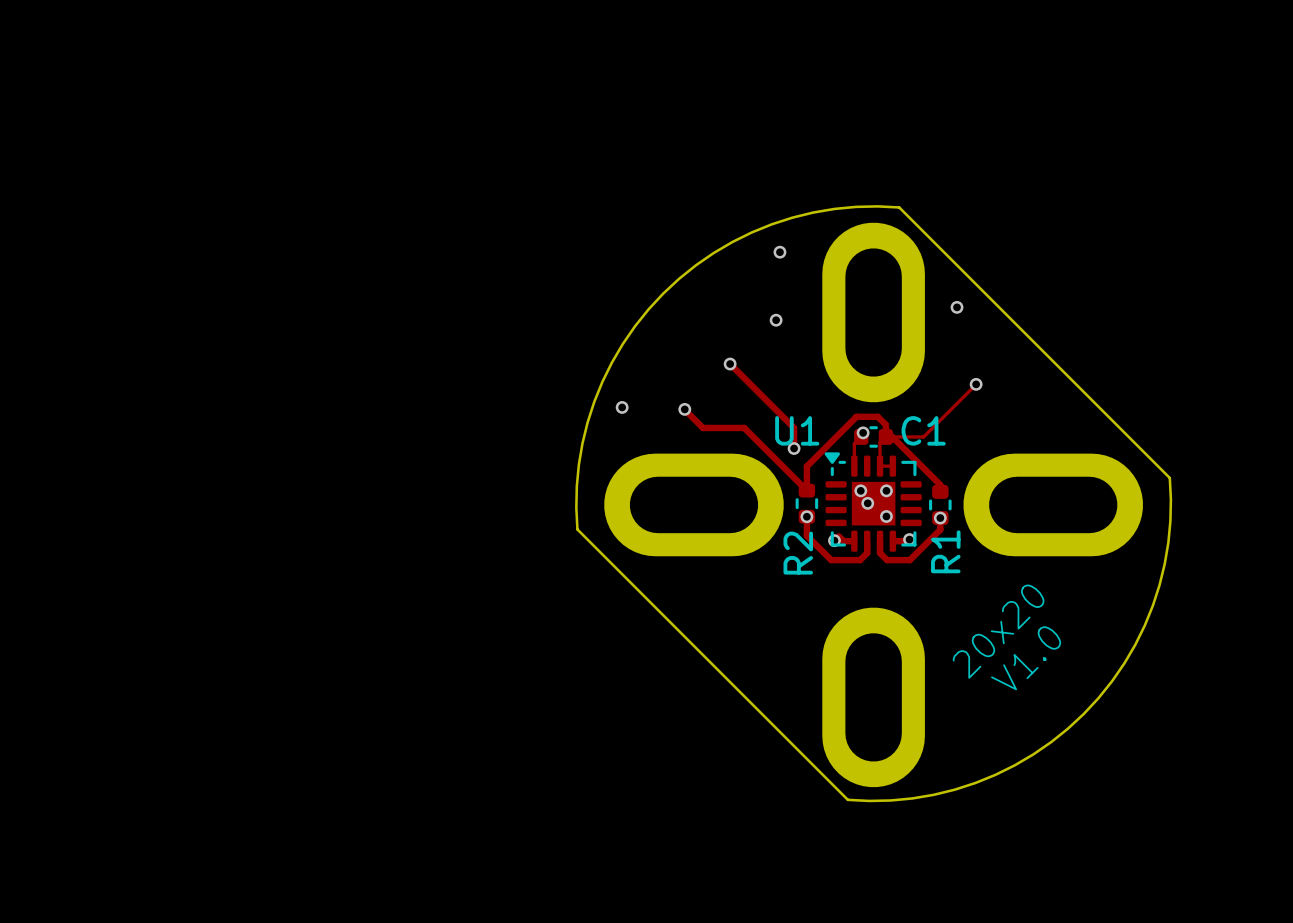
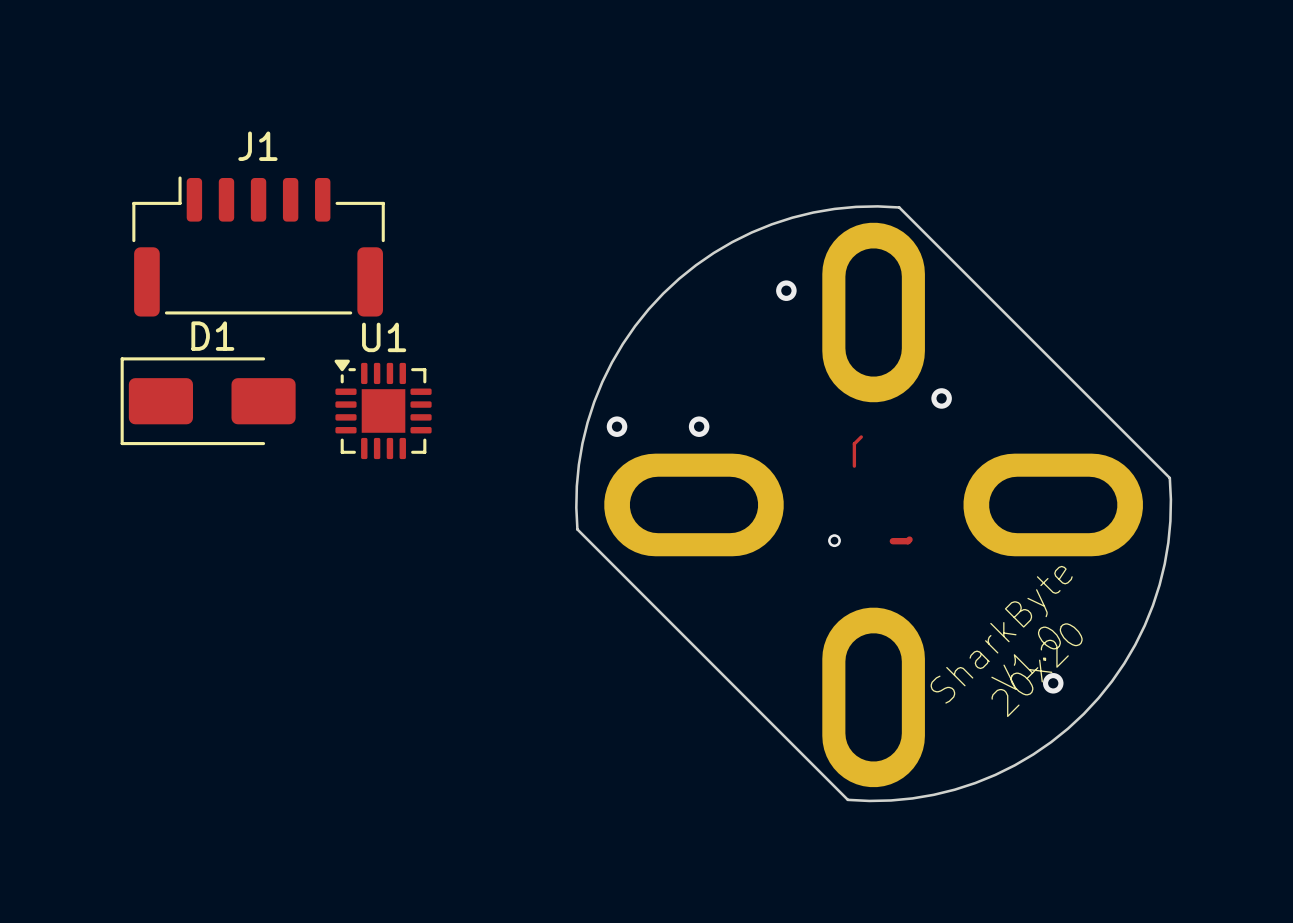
J1: none -> (258, 246)
via: (779, 252) -> none
via: none -> (786, 290)
via: (957, 307) -> none
via: (776, 320) -> none
track: (730, 364) (794, 427) (794, 448) -> none
via: (730, 364) -> none
track: (976, 384) (923, 436) (885, 436) -> none
via: (976, 384) -> none
via: none -> (941, 398)
D1: none -> (208, 401)
via: (622, 407) -> none
track: (684, 409) (702, 427) (744, 427) (806, 490) (806, 466) (856, 416) (877, 416) (885, 424) (885, 436) -> none
via: (684, 409) -> none
via: none -> (617, 426)
via: none -> (699, 426)
U1 name position: U1 (797, 430) -> U1 (384, 337)
via: (863, 432) -> none
C1: (873, 436) -> none
track: (885, 436) (892, 436) (940, 484) (940, 491) -> none
track: (885, 436) (880, 442) (880, 466) (892, 466) -> none
via: (794, 448) -> none
via: (860, 490) -> none
via: (886, 490) -> none
U1 position: (873, 502) -> (383, 409)
R2: (806, 503) -> none
via: (867, 503) -> none
R1: (940, 504) -> none
track: (806, 516) (806, 535) (831, 560) (860, 560) (867, 553) (867, 541) -> none
via: (806, 516) -> none
via: (886, 516) -> none
track: (940, 518) (940, 529) (909, 560) (887, 560) (880, 553) (880, 541) -> none
via: (940, 518) -> none
track: (838, 536) (843, 541) (854, 541) -> none
via: (909, 539) -> none
text: 20x20 (998, 631) -> SharkByte (1001, 634)
text: none -> 20x20 (1037, 670)
via: none -> (1053, 683)

